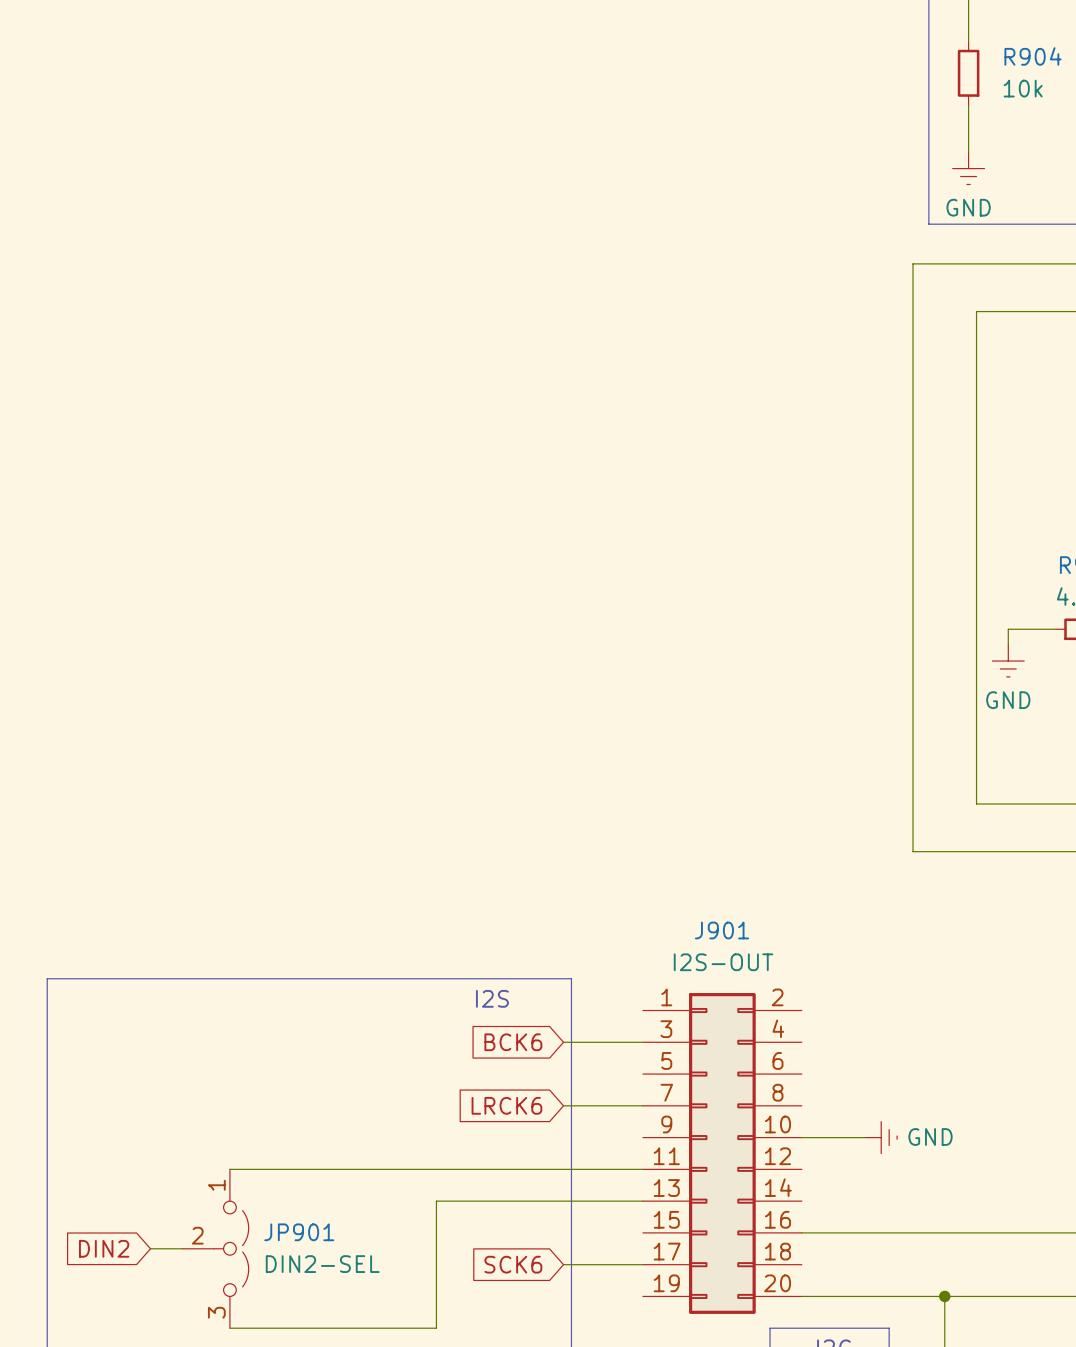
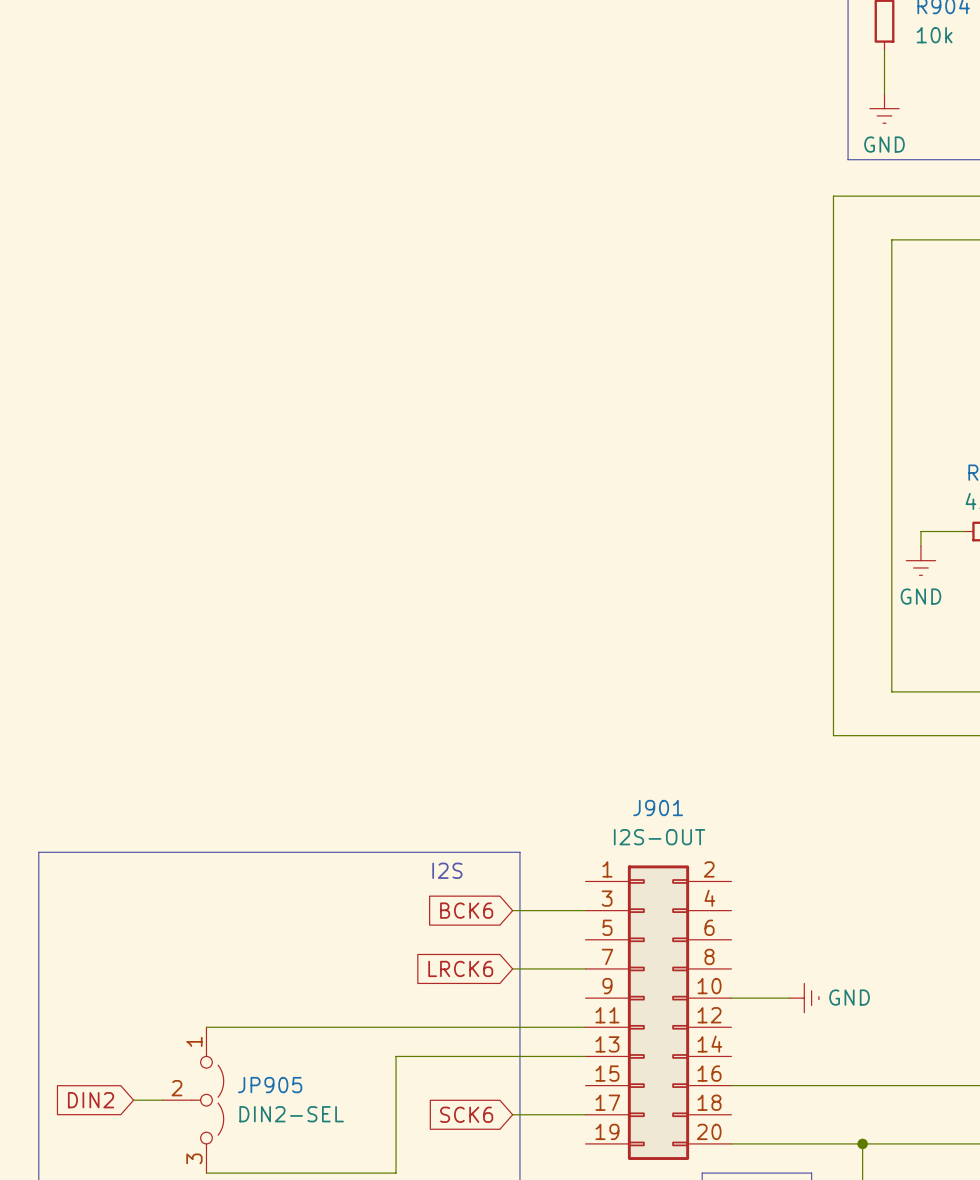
JP901 name: JP901 (299, 1232) -> JP905 (270, 1085)

